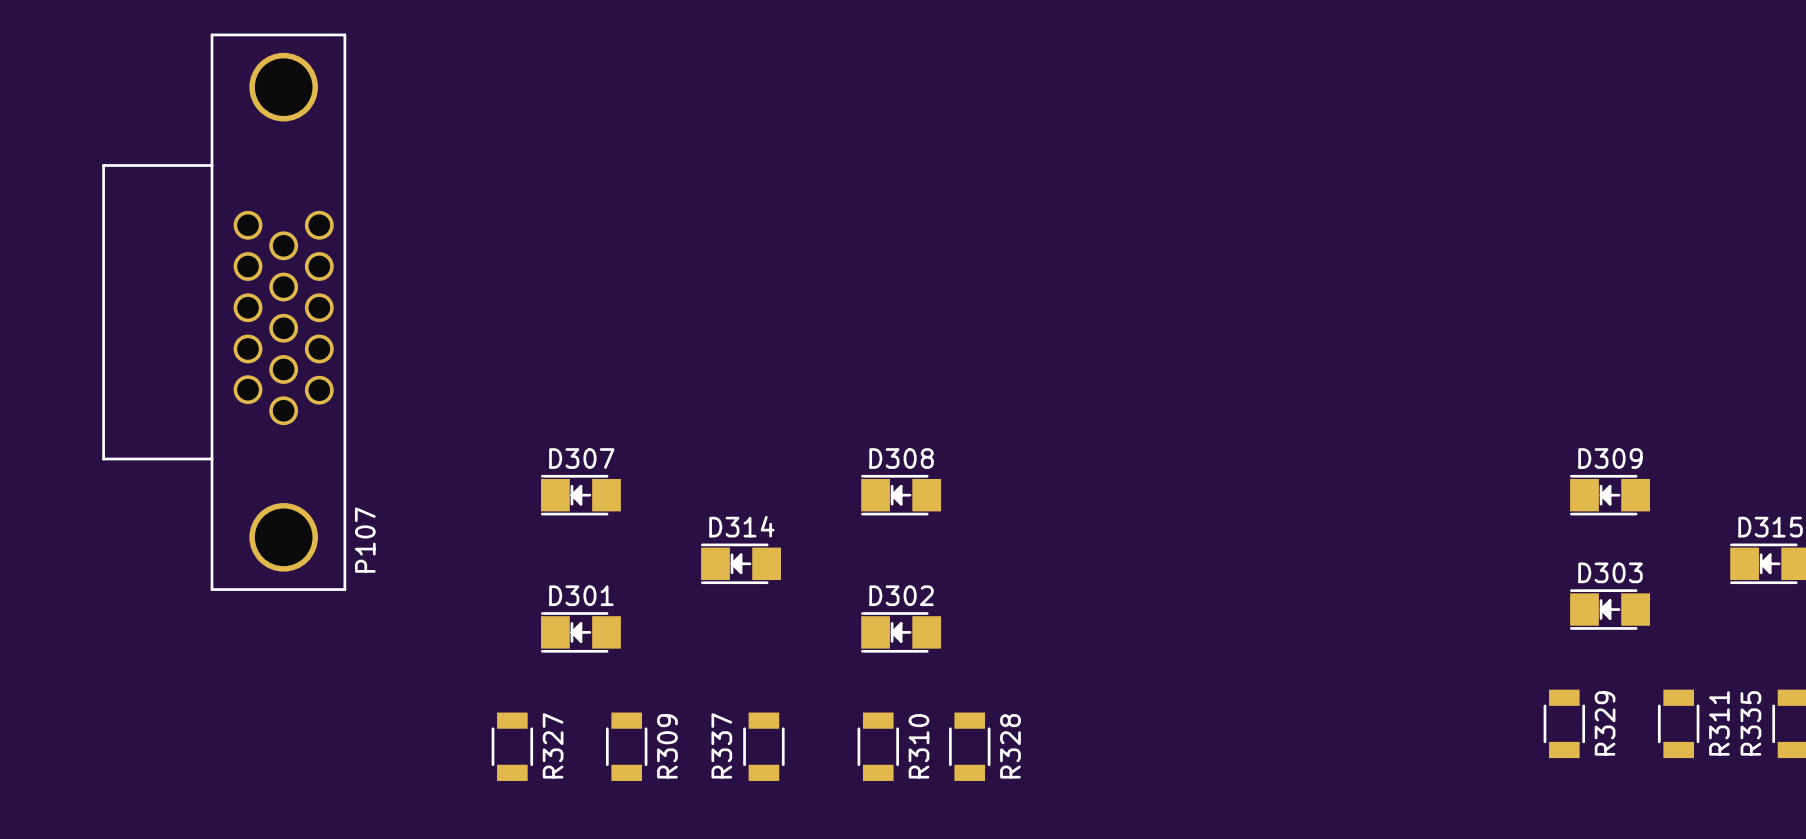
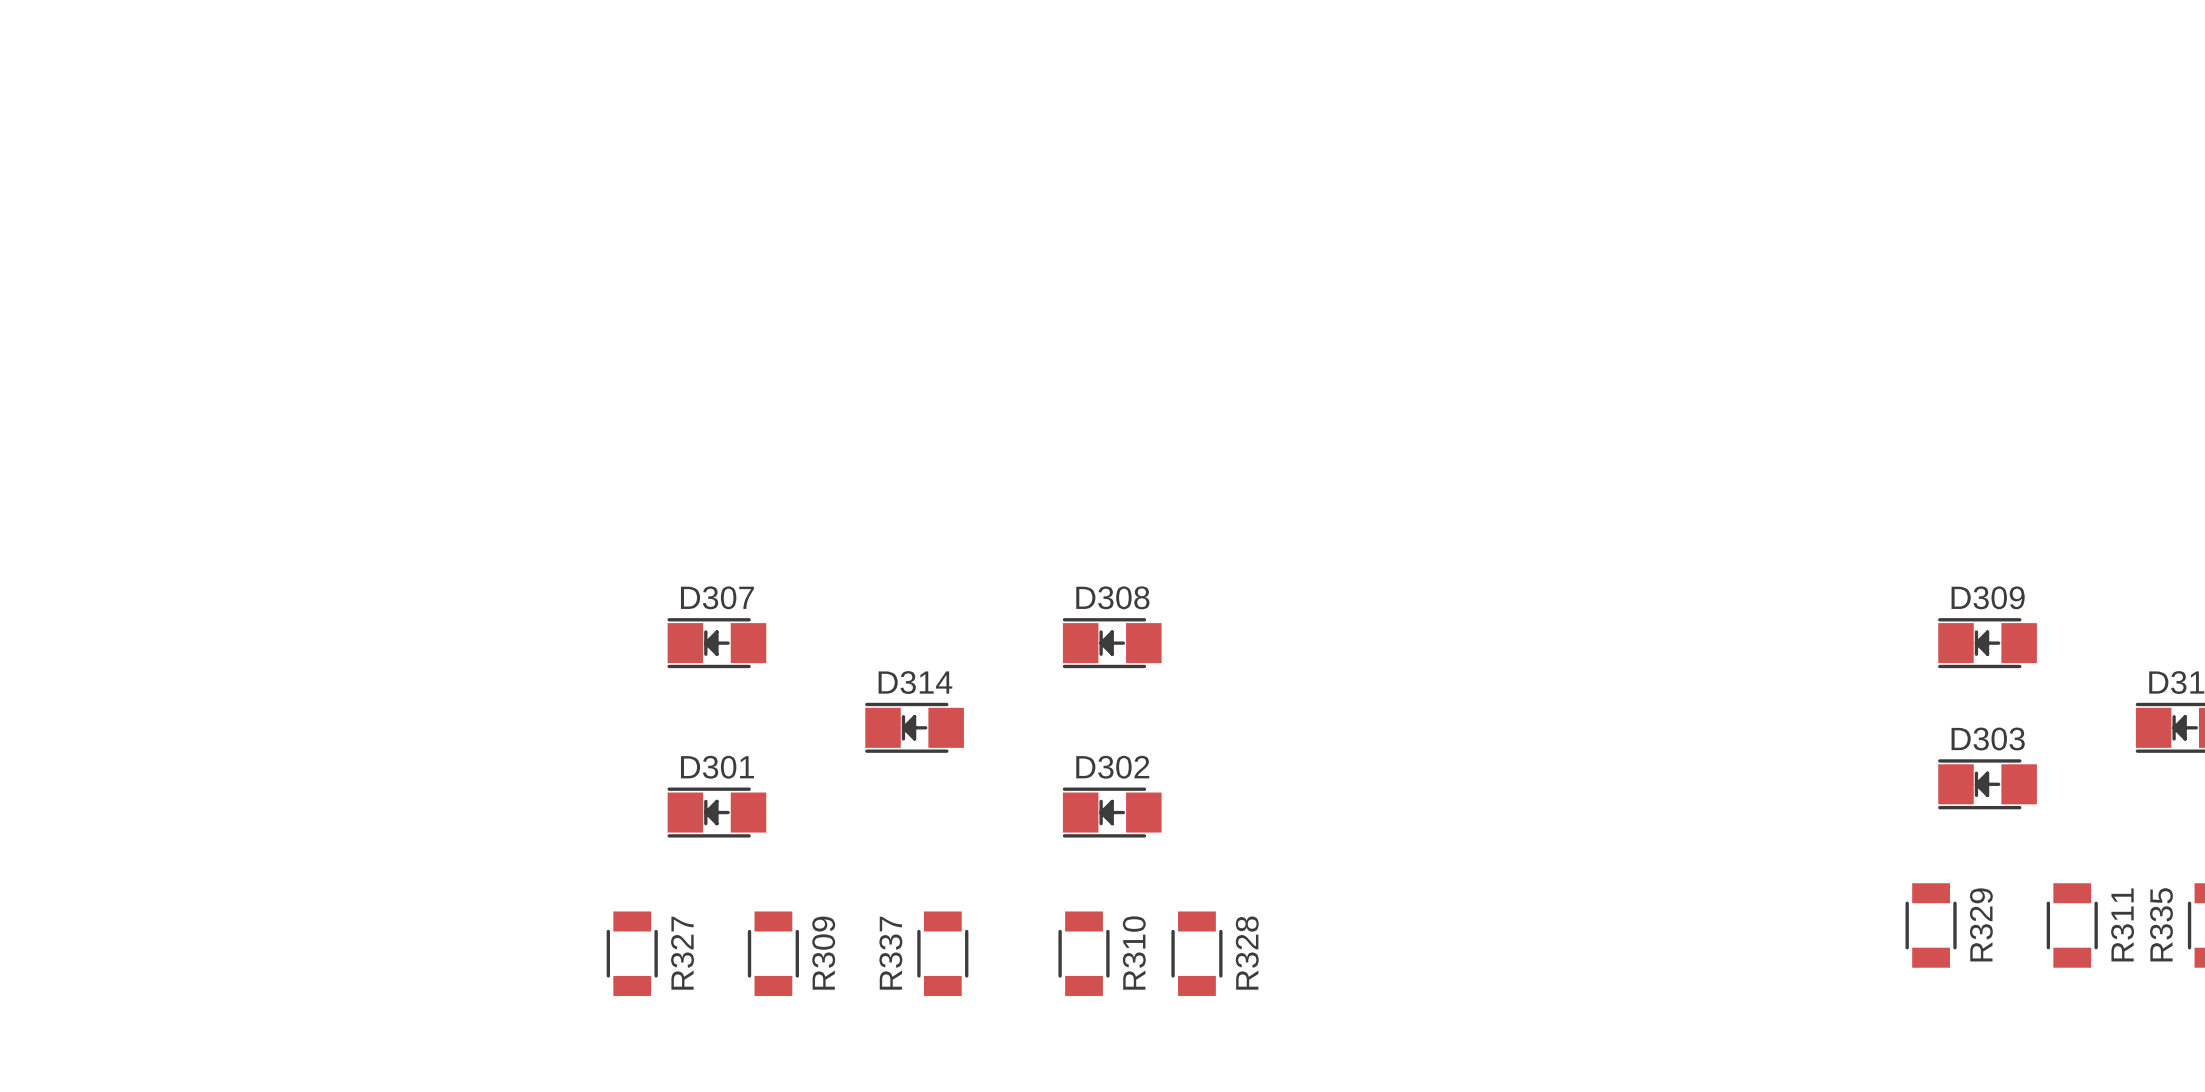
P107: (224, 312) -> none

